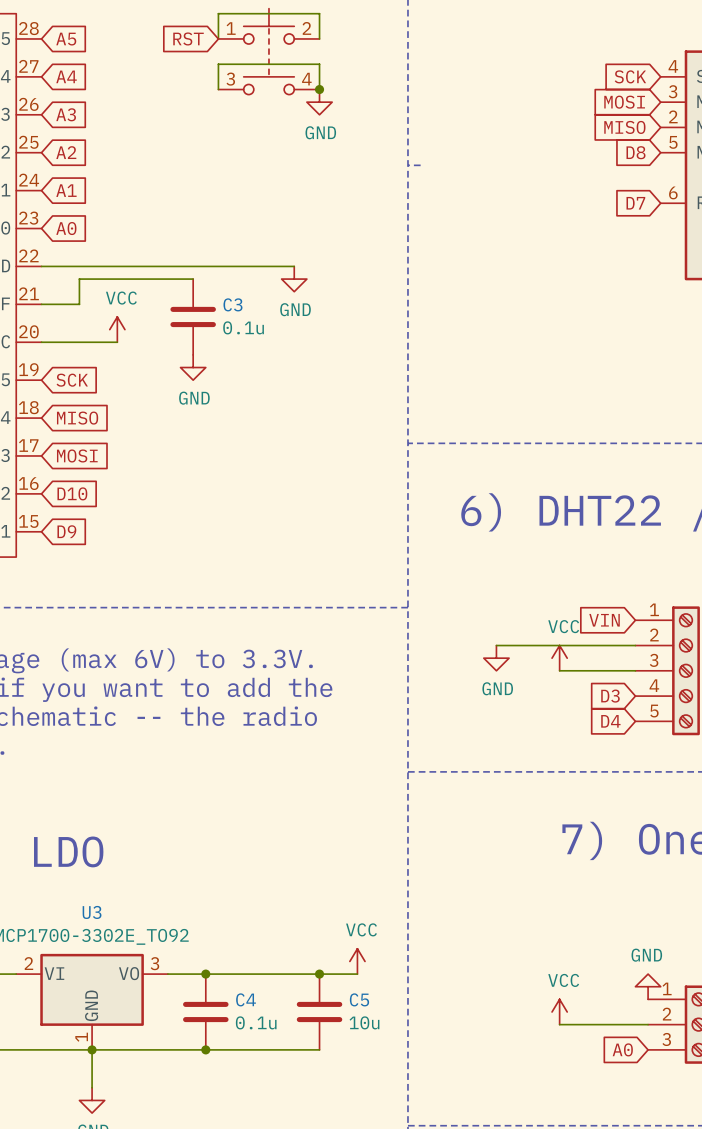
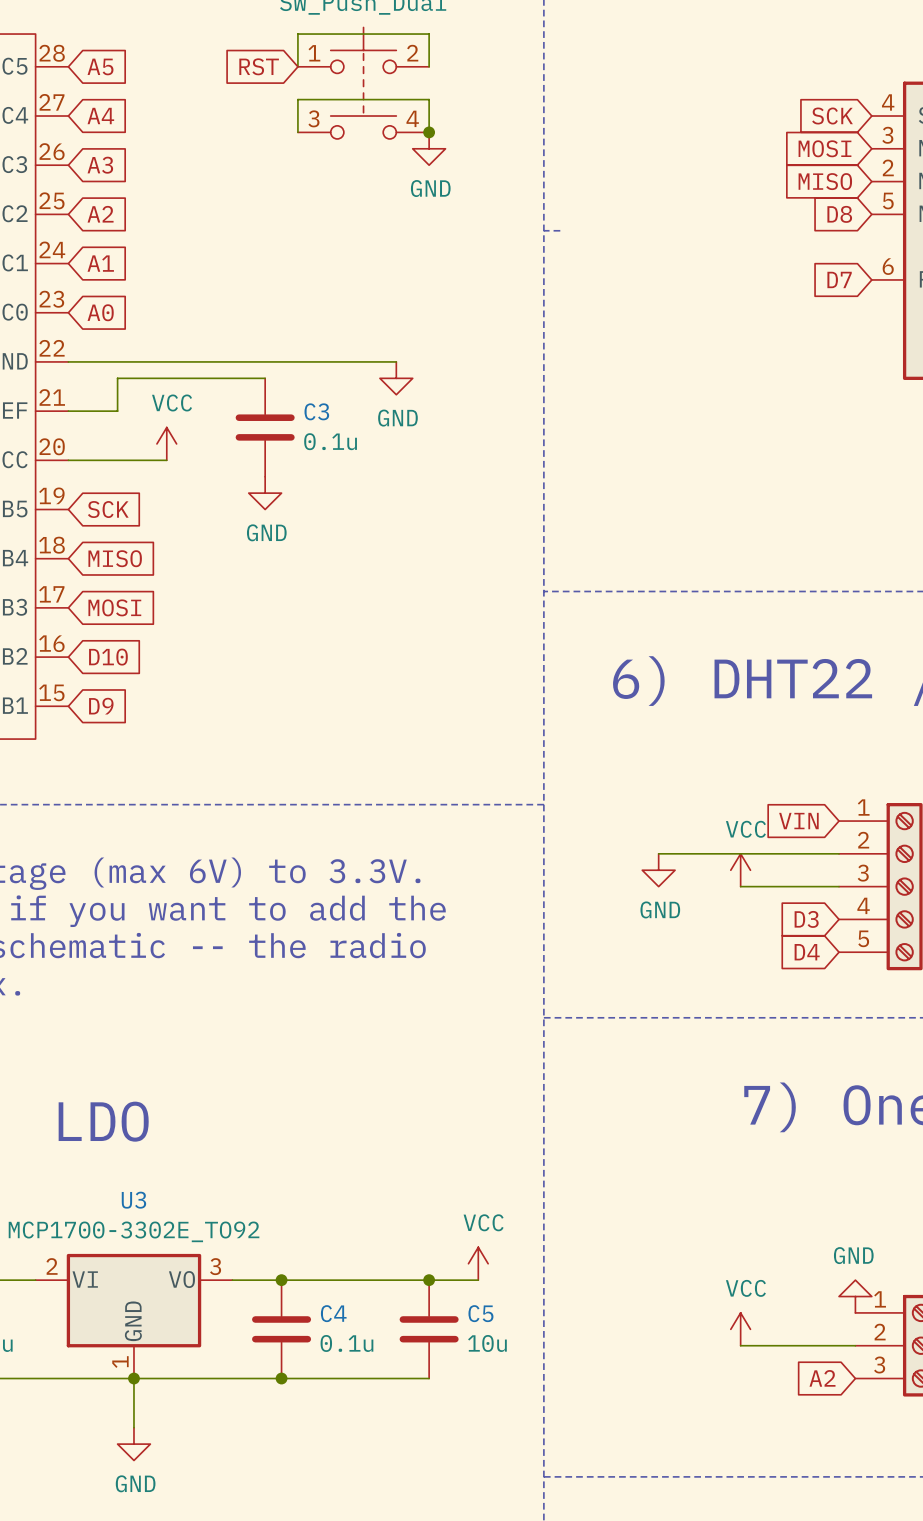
global label: A0 (622, 1049) -> A2 (822, 1378)

